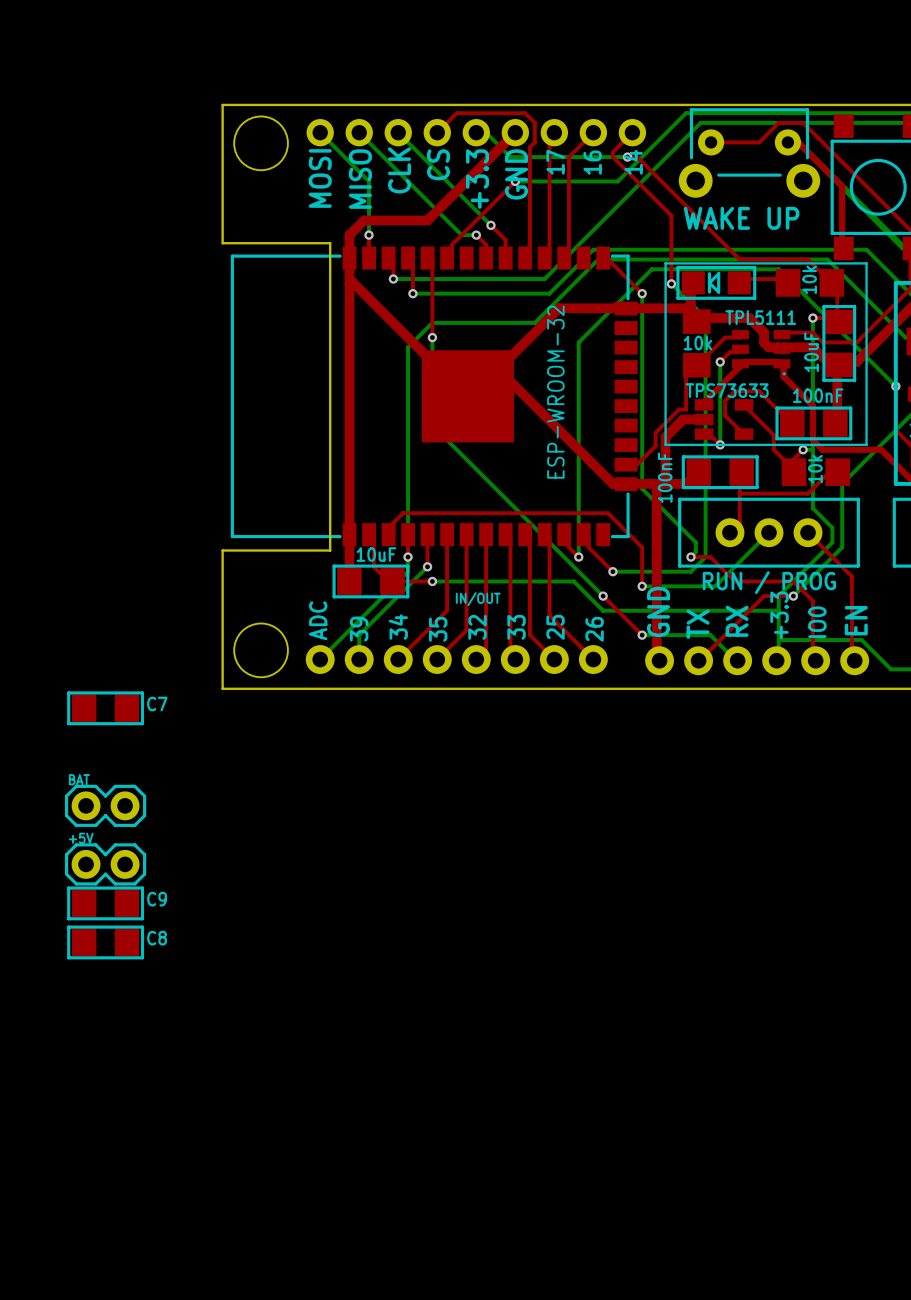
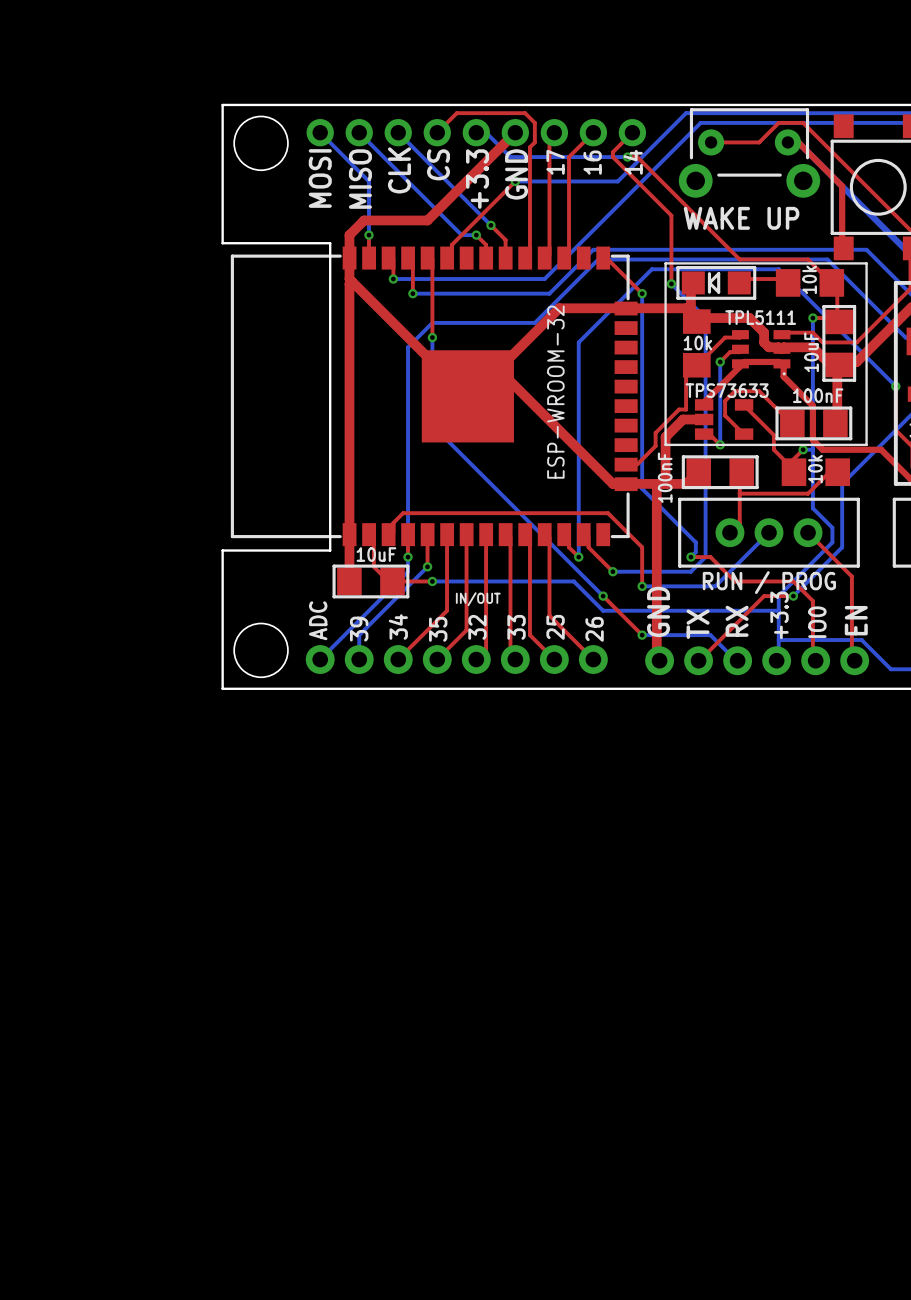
C7: (105, 708) -> none
BAT: (105, 805) -> none
+5V: (105, 864) -> none
C9: (105, 903) -> none
C8: (105, 942) -> none

